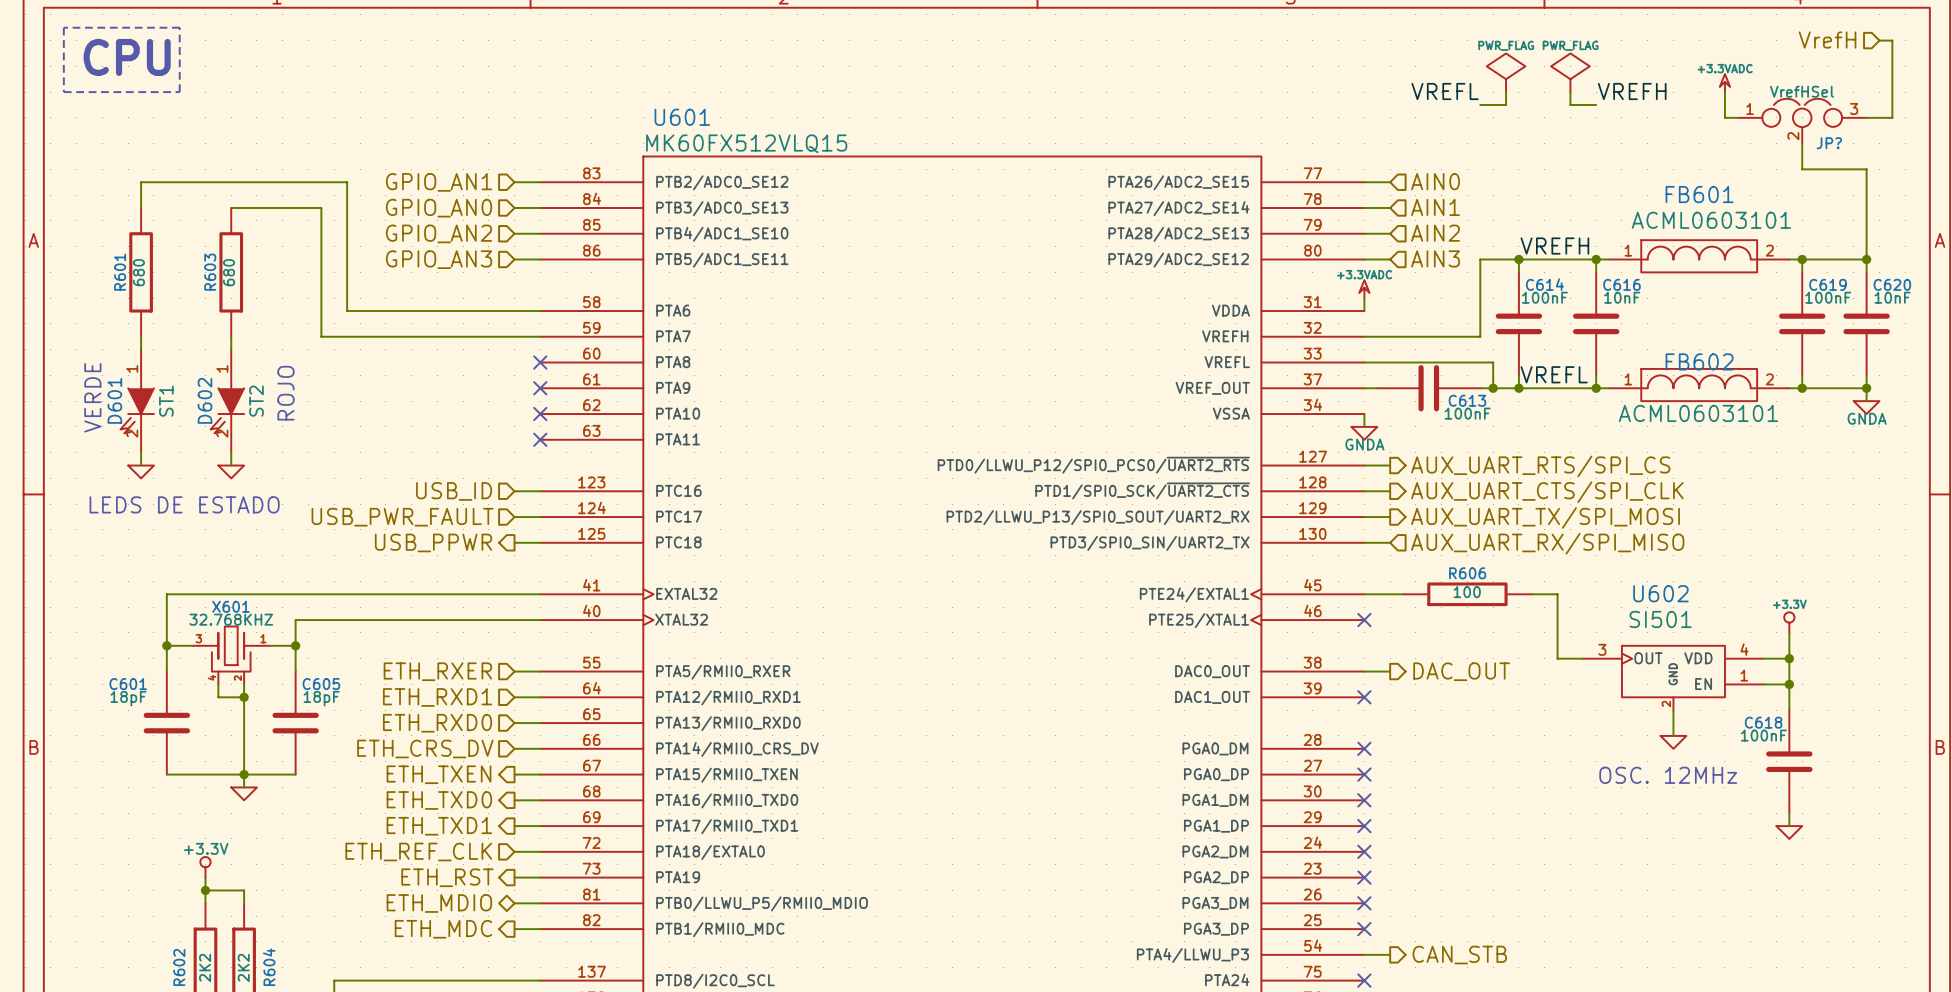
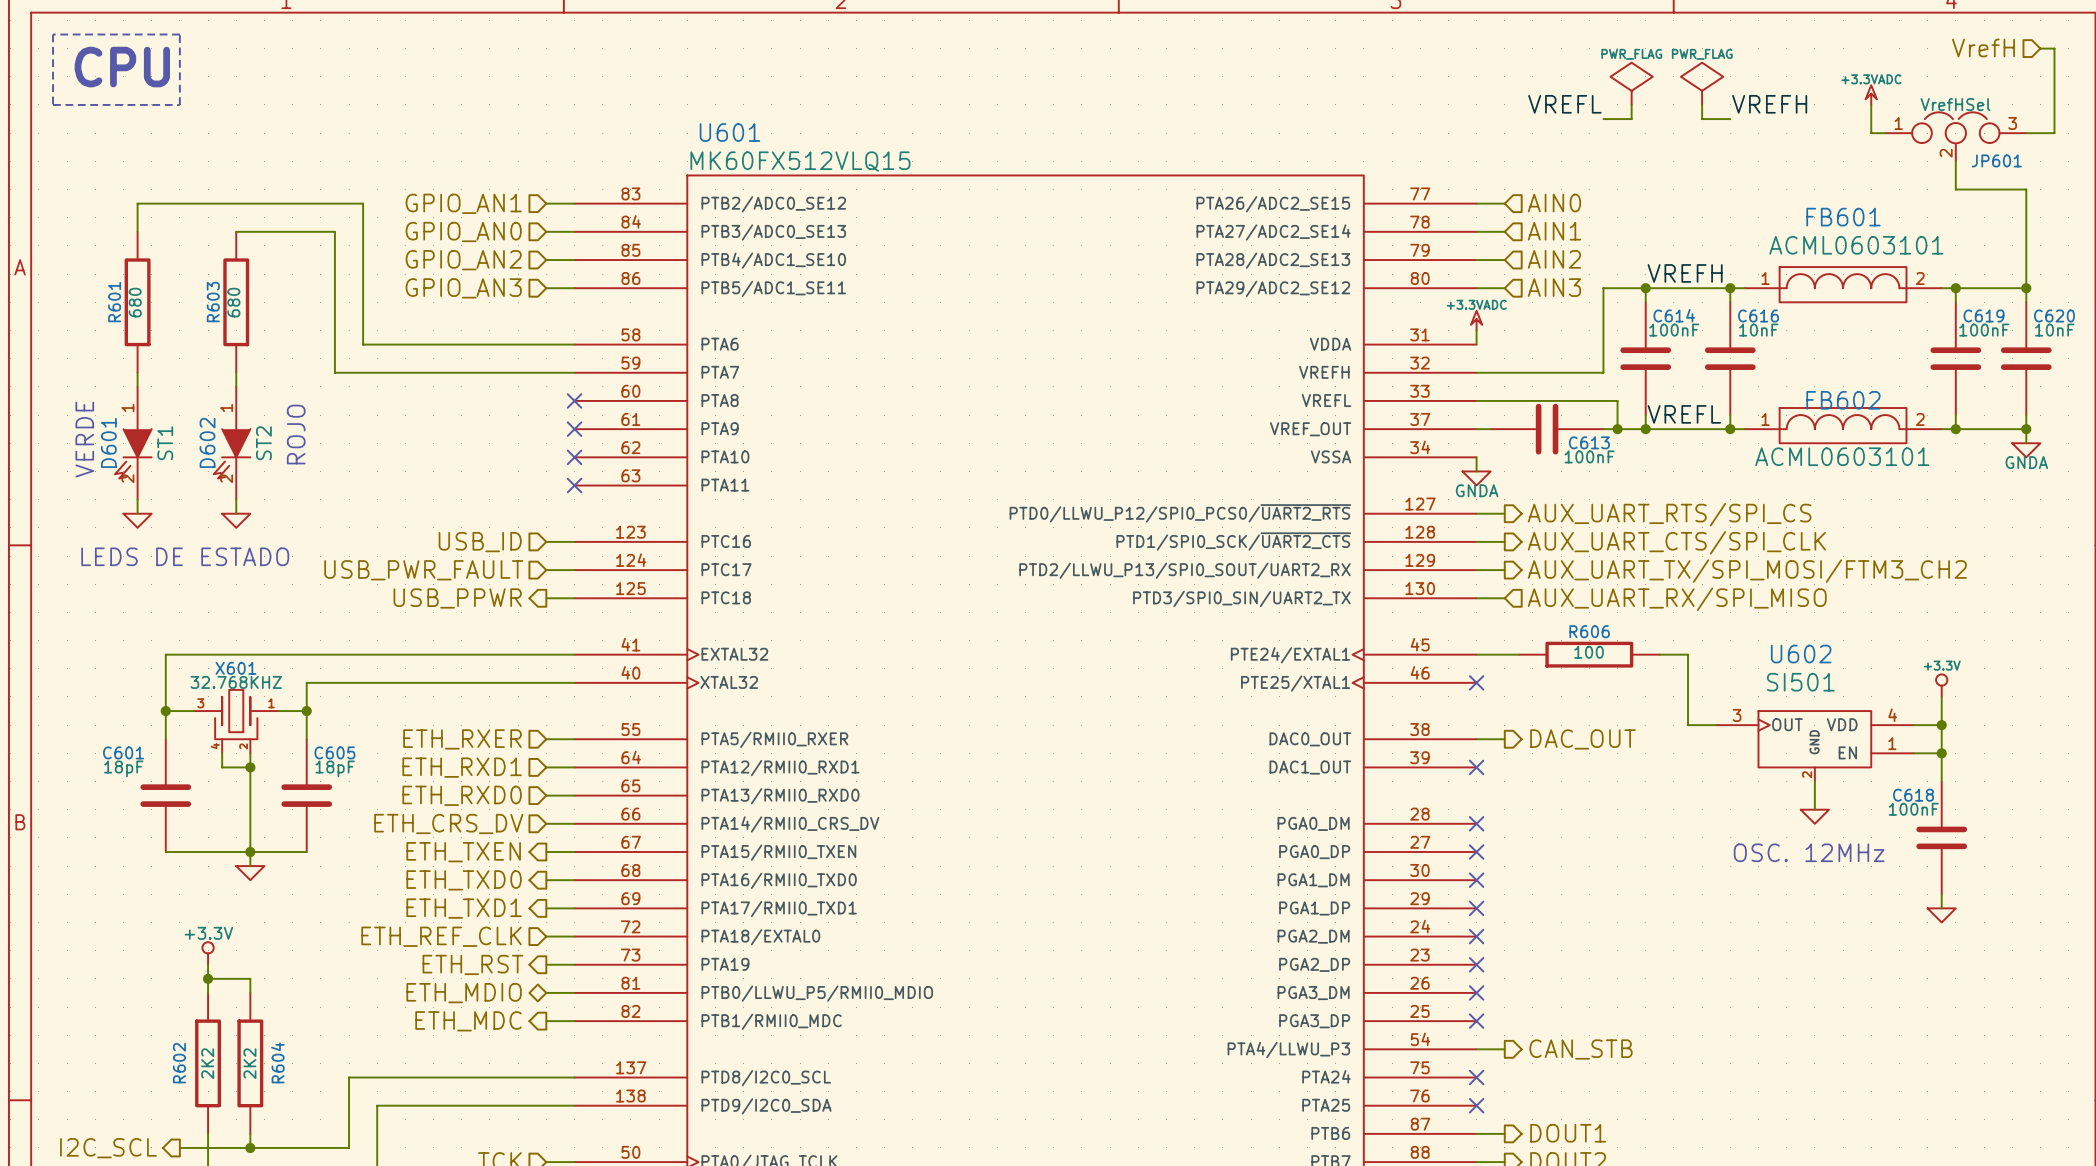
JP? name: JP? (1829, 143) -> JP601 (1996, 160)
hierarchical label: AUX_UART_TX/SPI_MOSI (1545, 517) -> AUX_UART_TX/SPI_MOSI/FTM3_CH2 (1747, 571)

